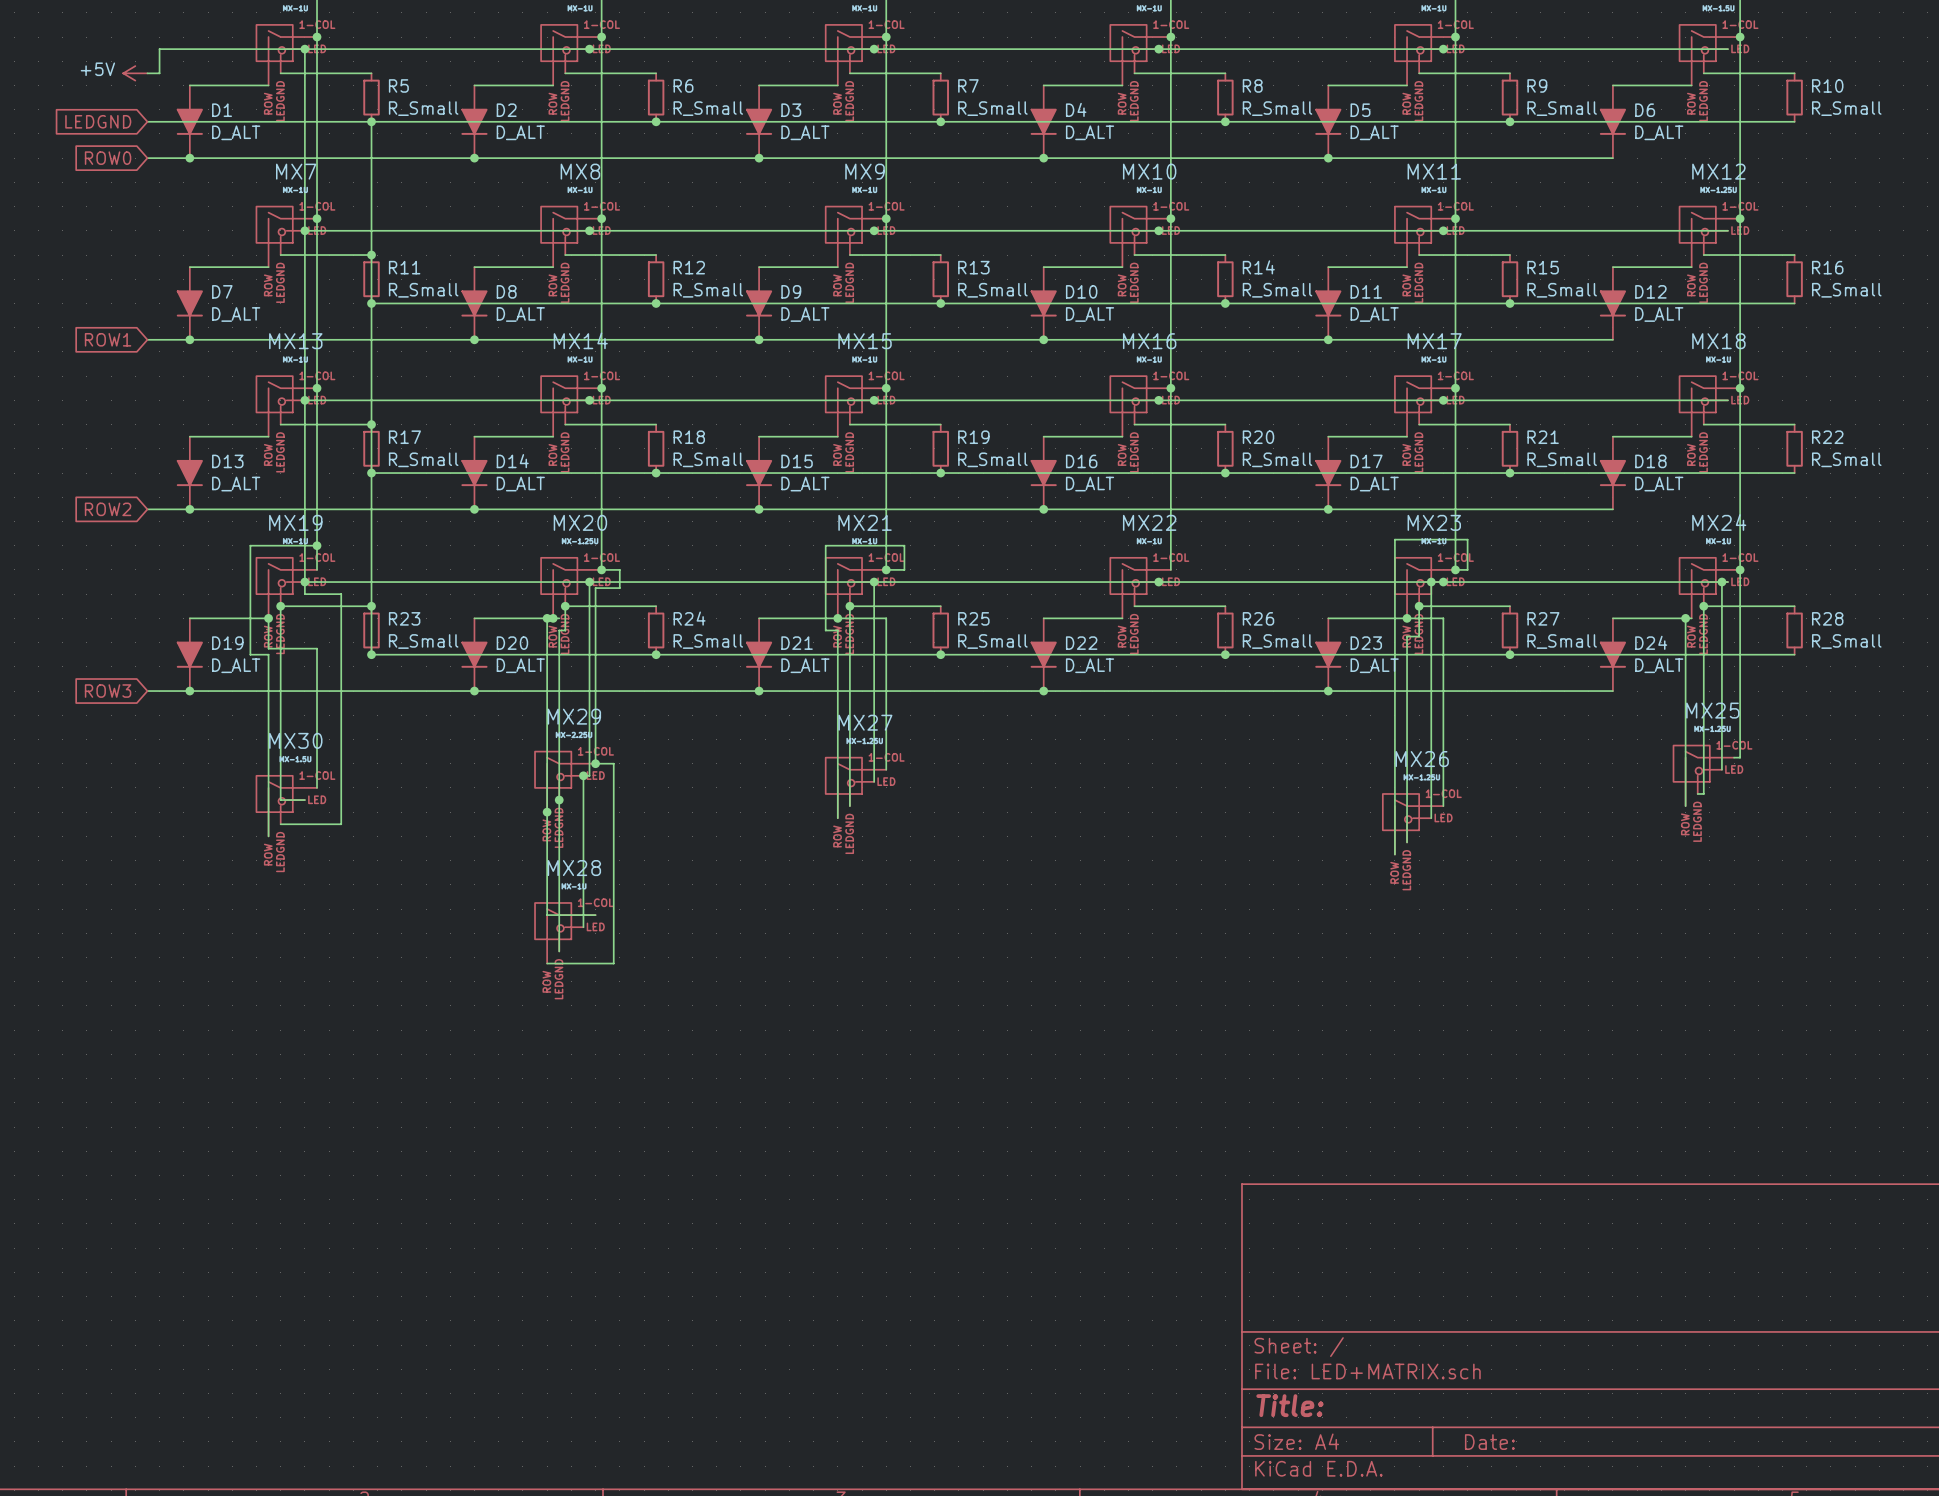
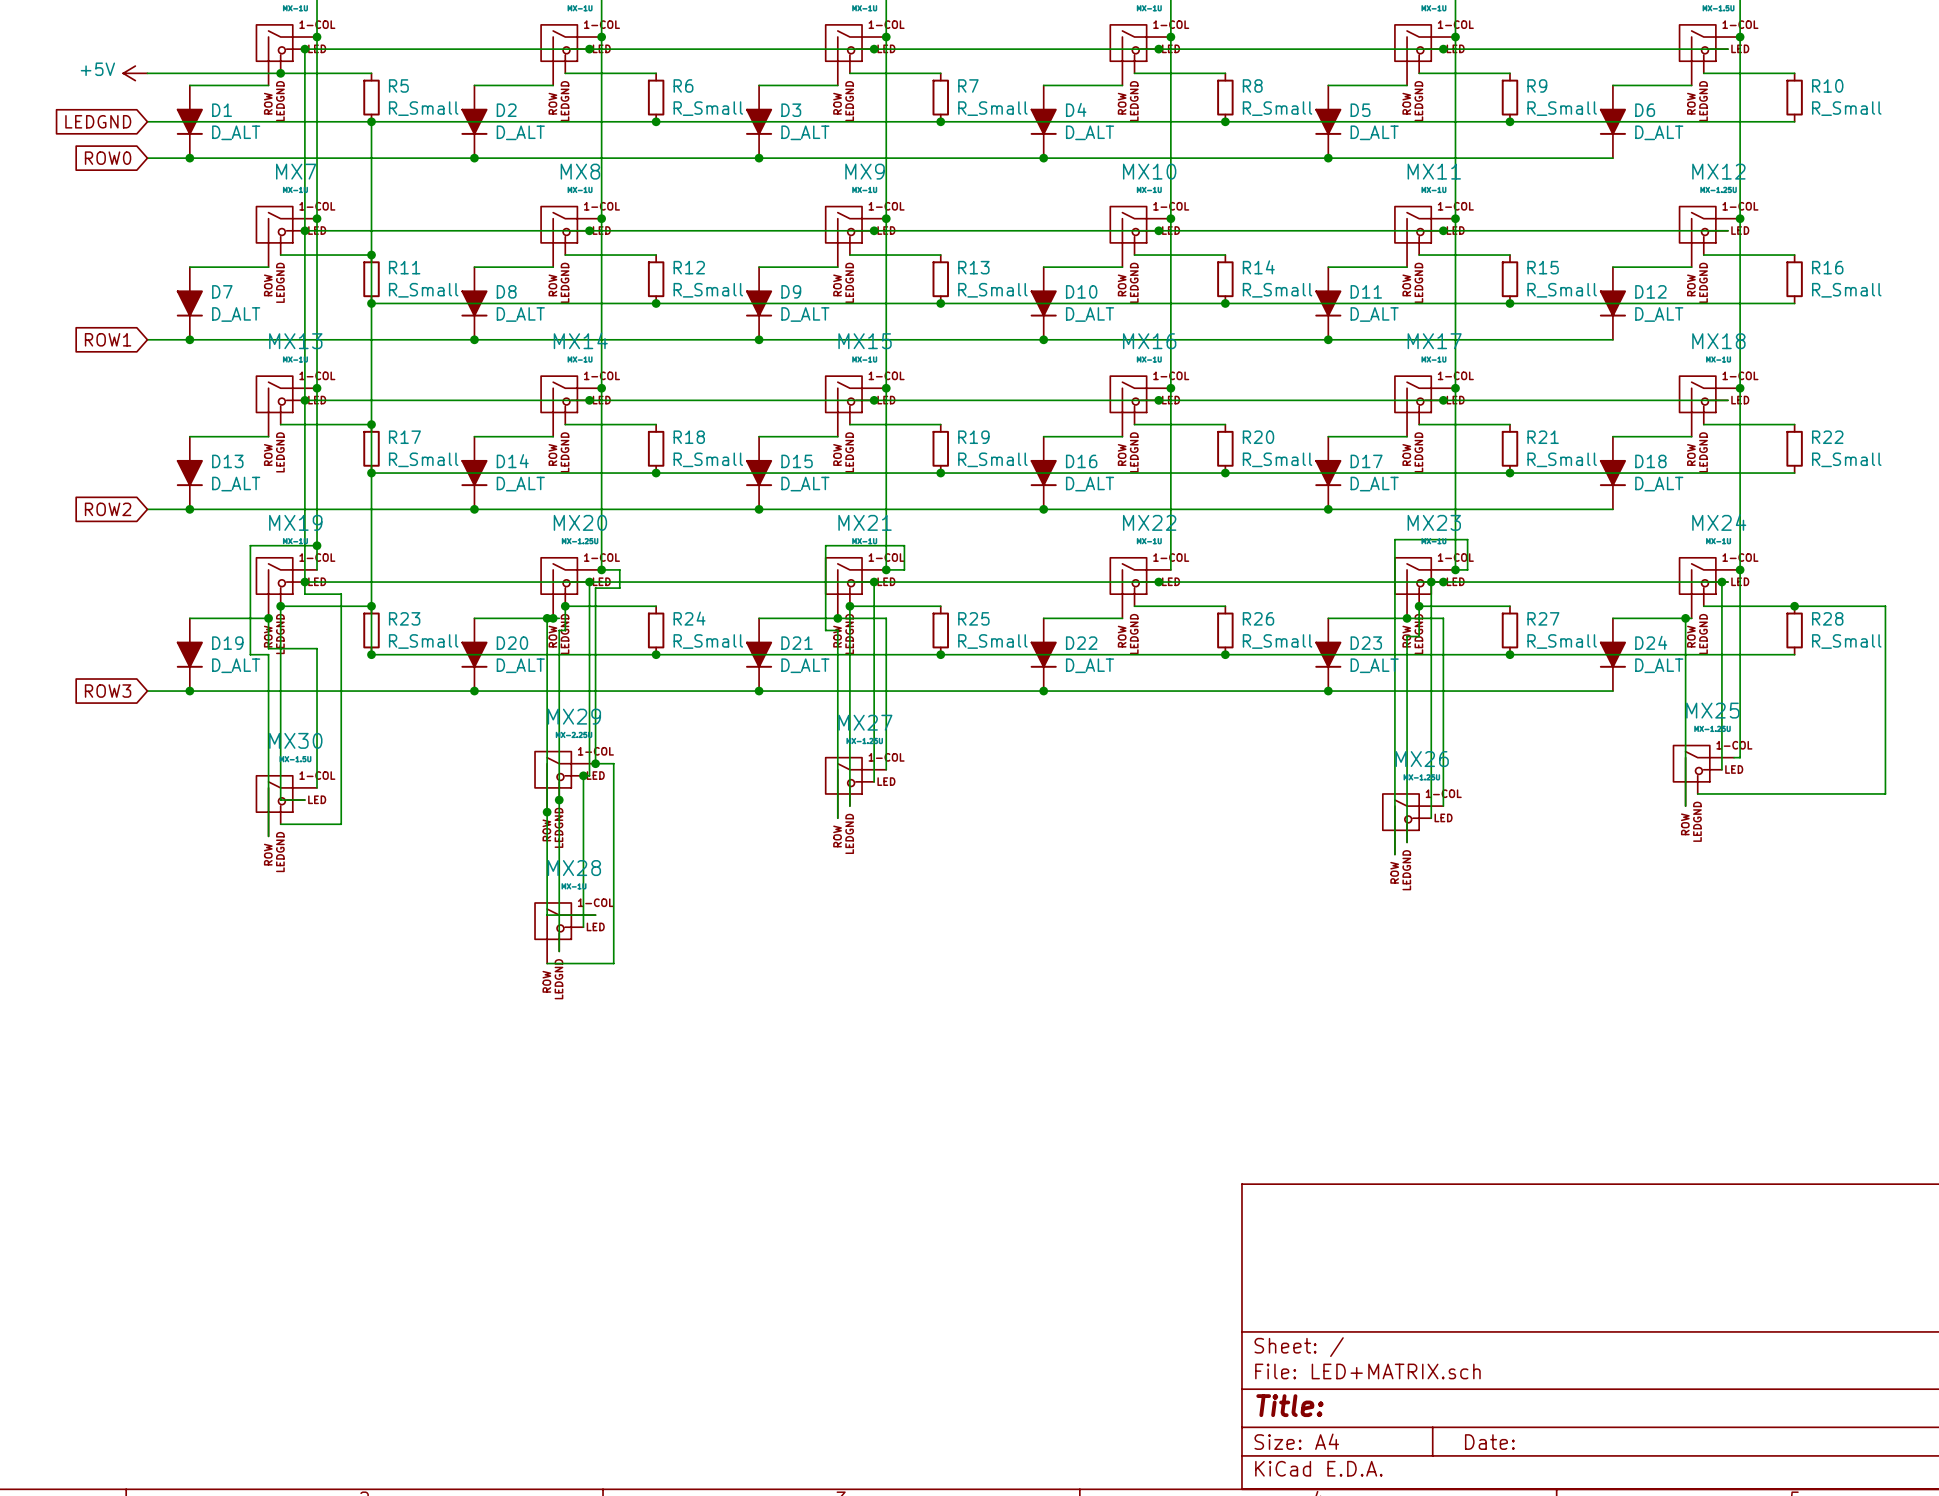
wire: (304, 49) (159, 49) (159, 73) -> (280, 73) (159, 73)
junction: none -> (280, 73)
wire: (1703, 606) (1703, 793) -> (1794, 606) (1885, 606) (1885, 793) (1703, 793)
junction: (1703, 606) -> none
junction: none -> (1794, 606)

